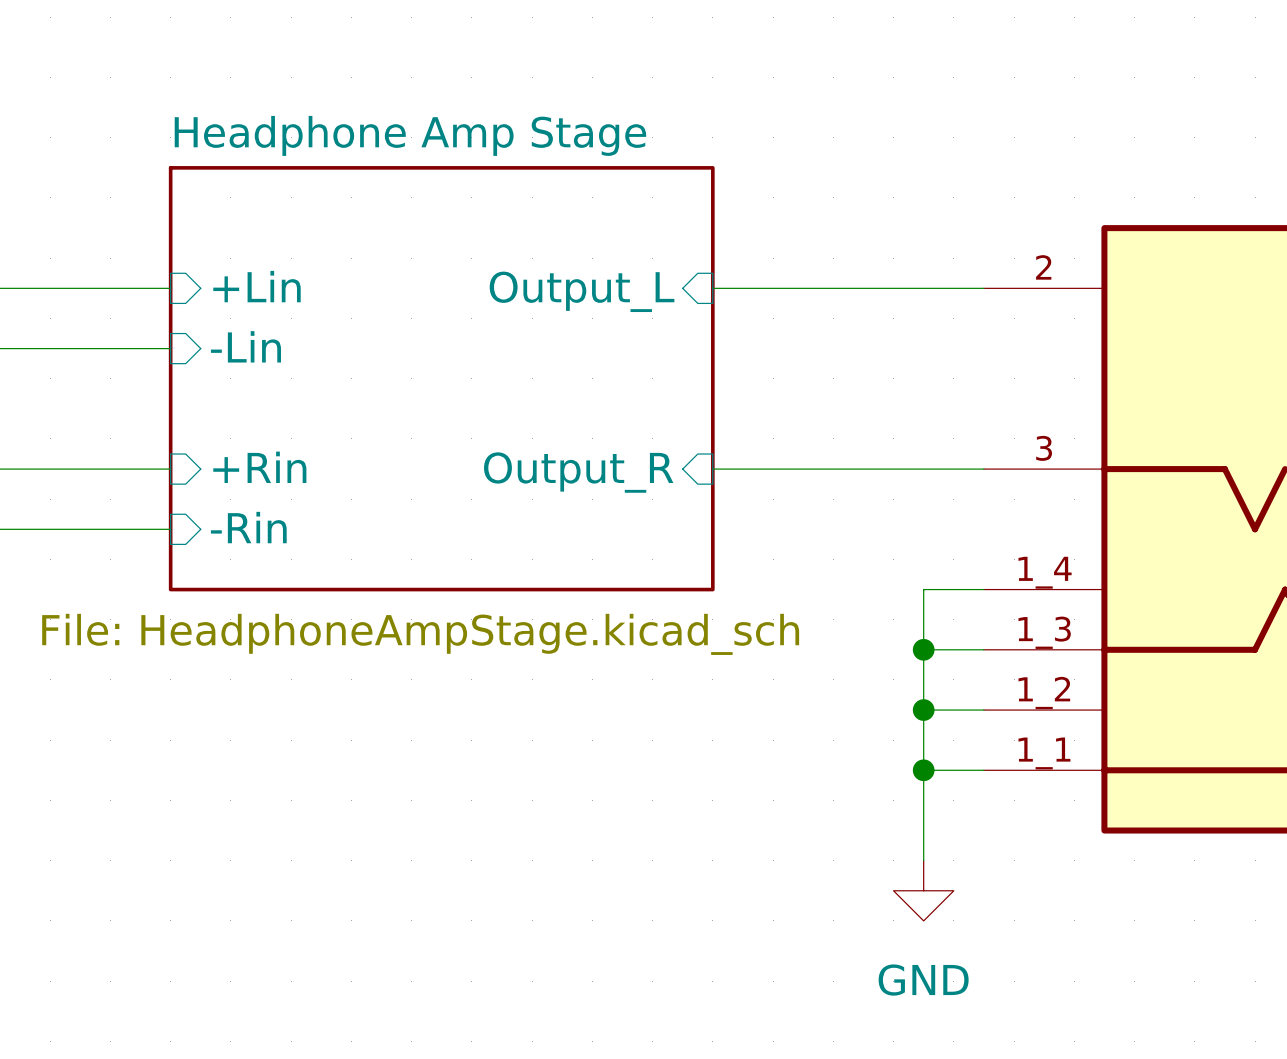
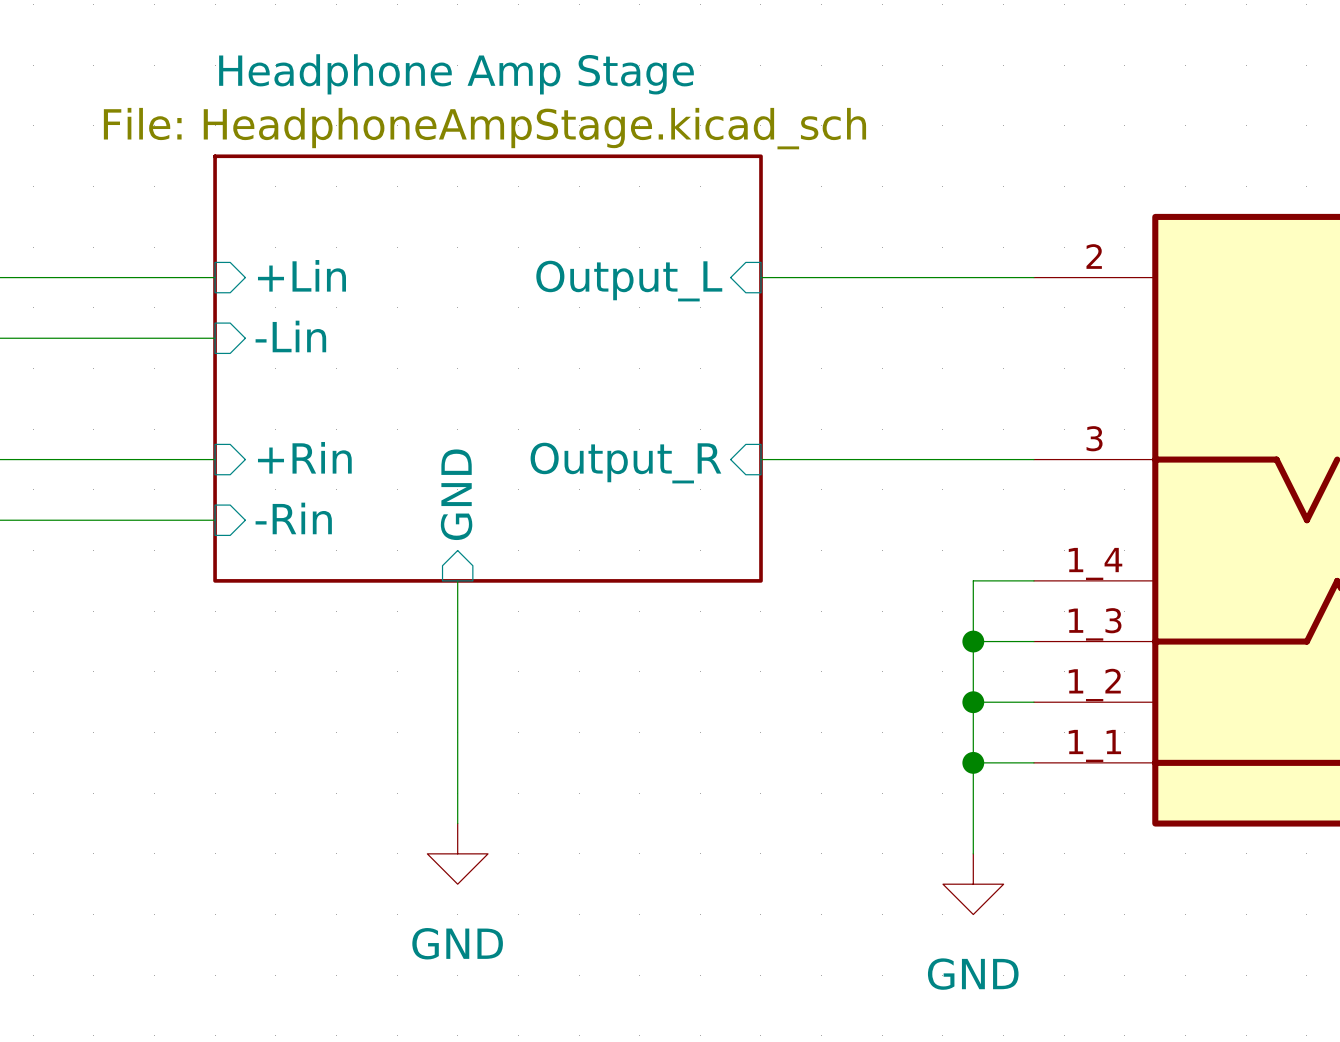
sheet Headphone Amp Stage name position: Headphone Amp Stage (410, 135) -> Headphone Amp Stage (456, 74)
sheet pin: none -> GND (456, 494)
wire: none -> (457, 580) (457, 823)
sheet Headphone Amp Stage value position: File: HeadphoneAmpStage.kicad_sch (420, 634) -> File: HeadphoneAmpStage.kicad_sch (484, 128)
power symbol: none -> GND (457, 853)

